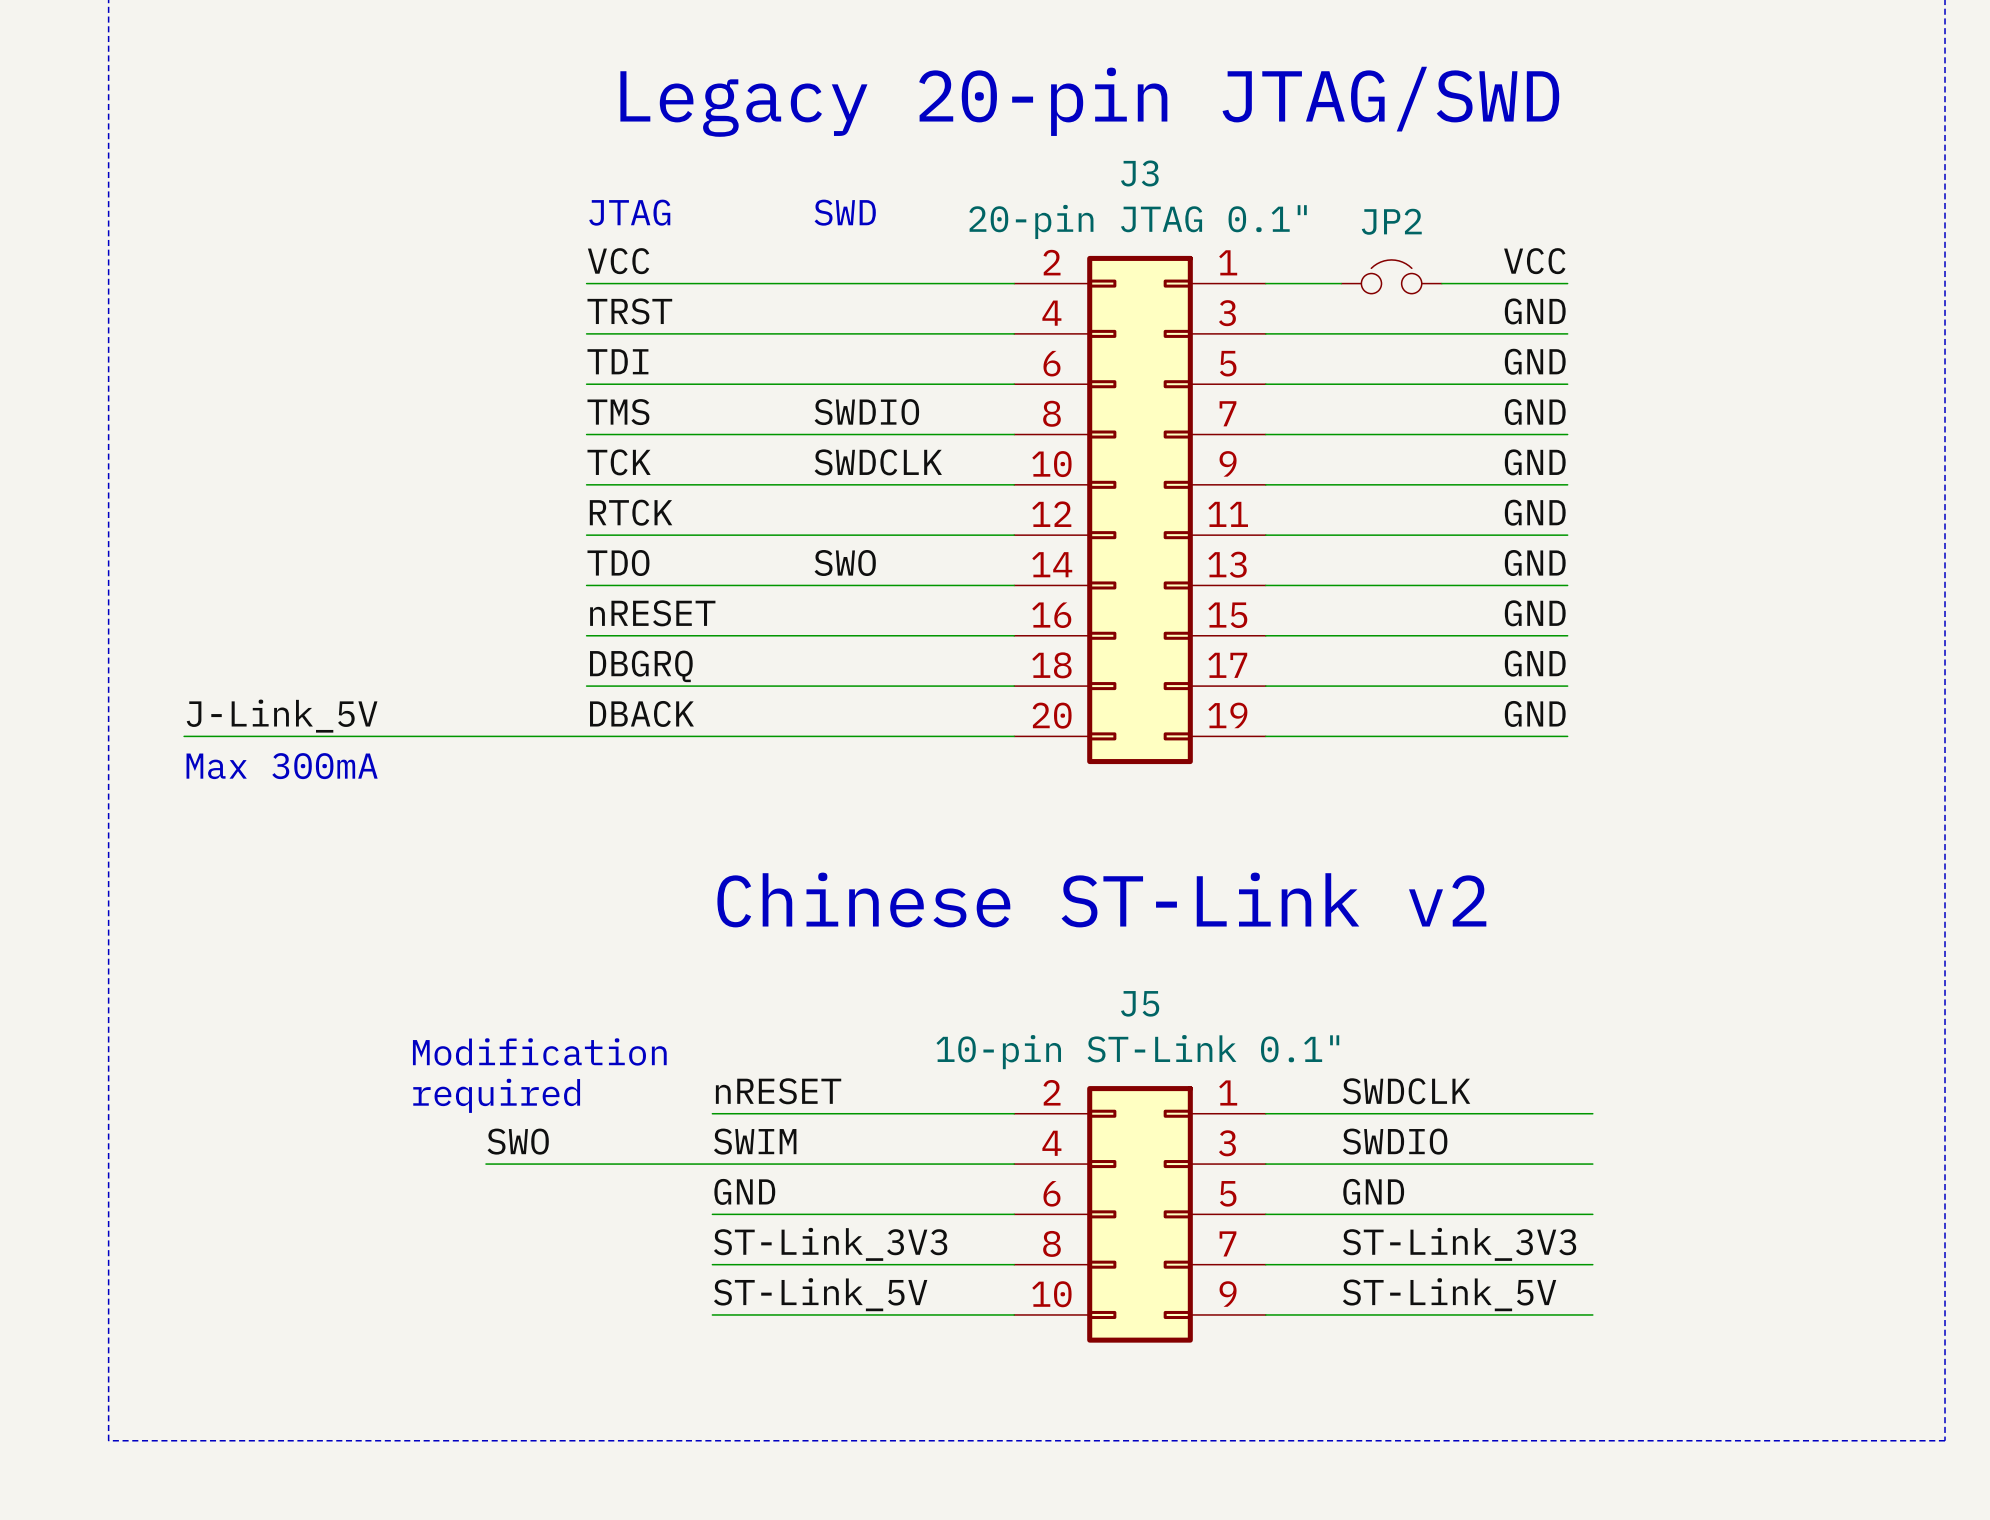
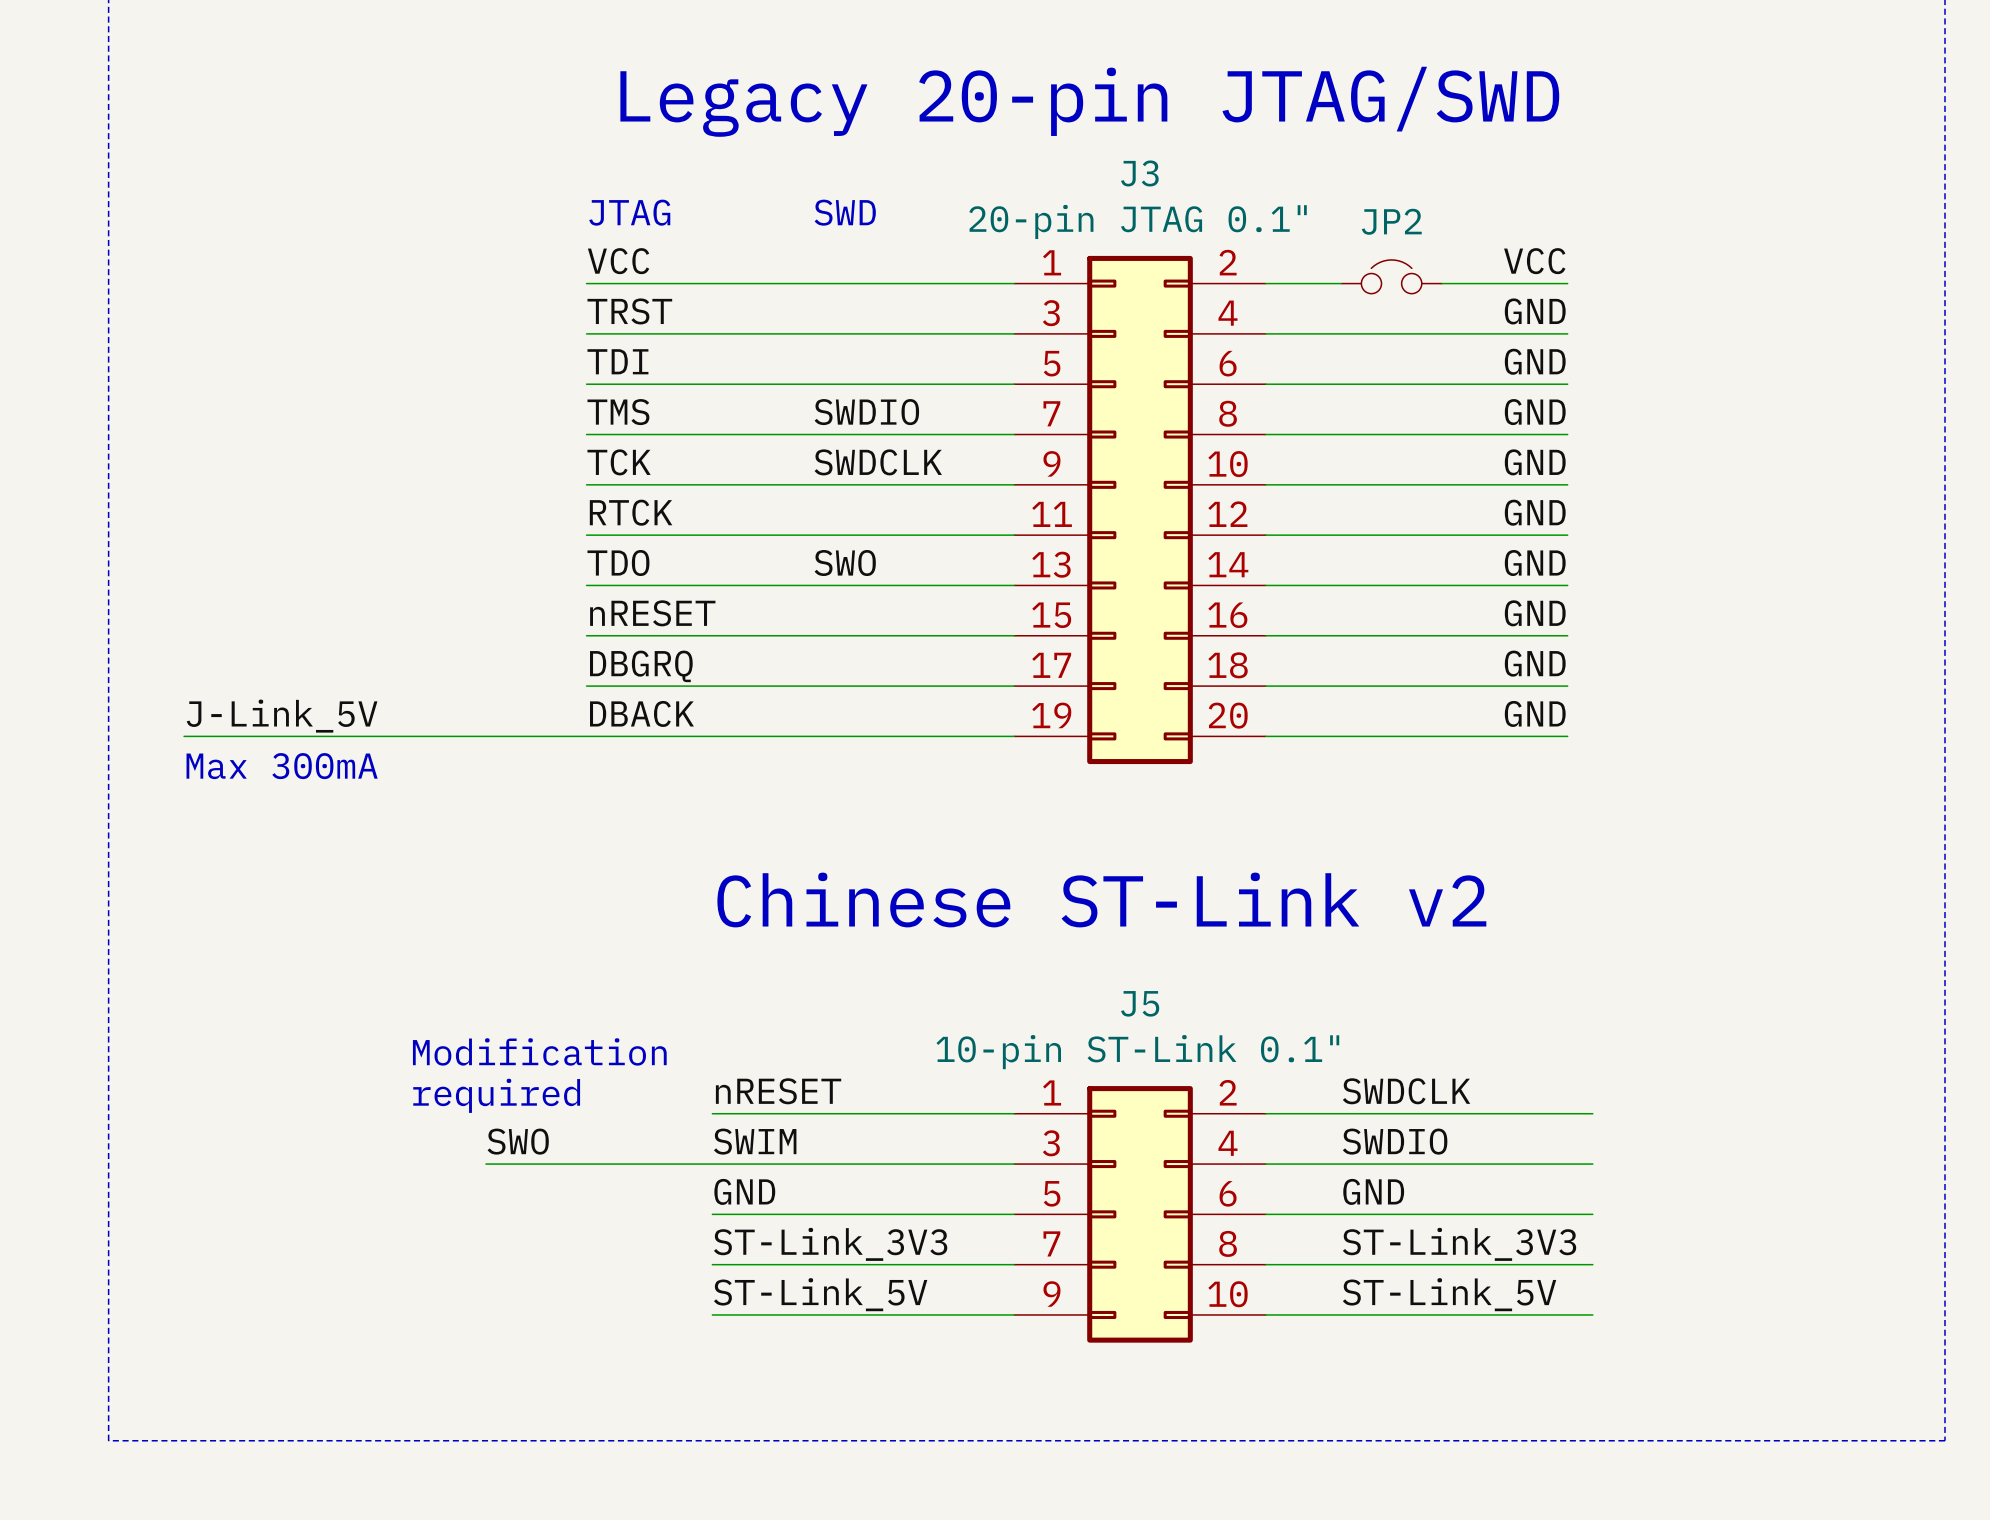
J3 flip: as is (1140, 509) -> left-right (1140, 509)
J5 flip: as is (1140, 1214) -> left-right (1140, 1214)

